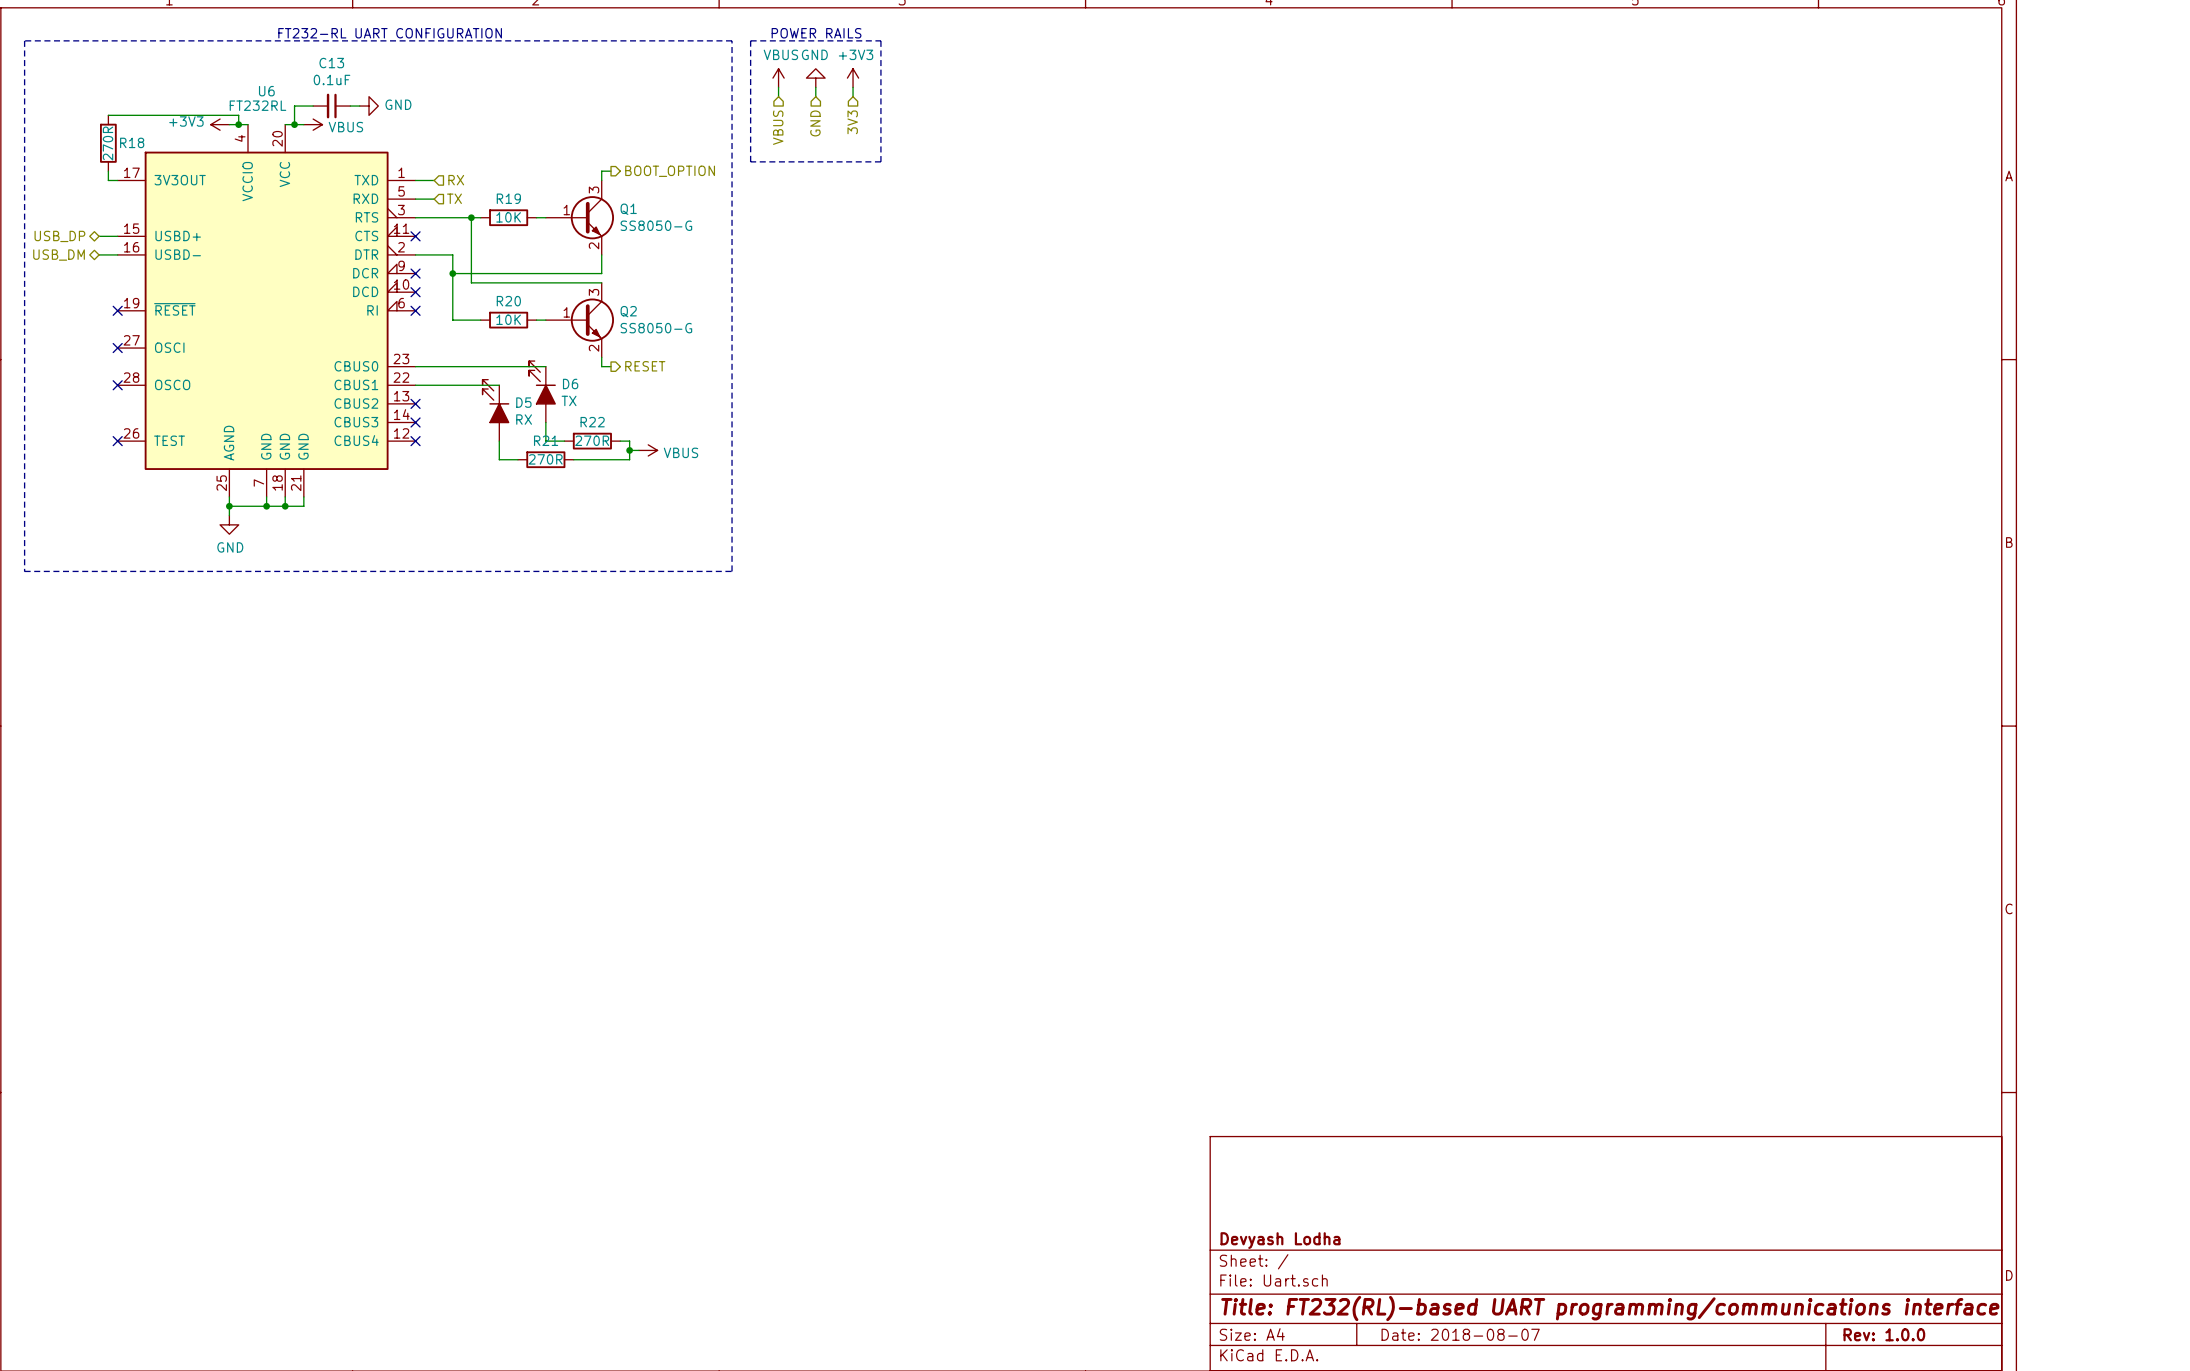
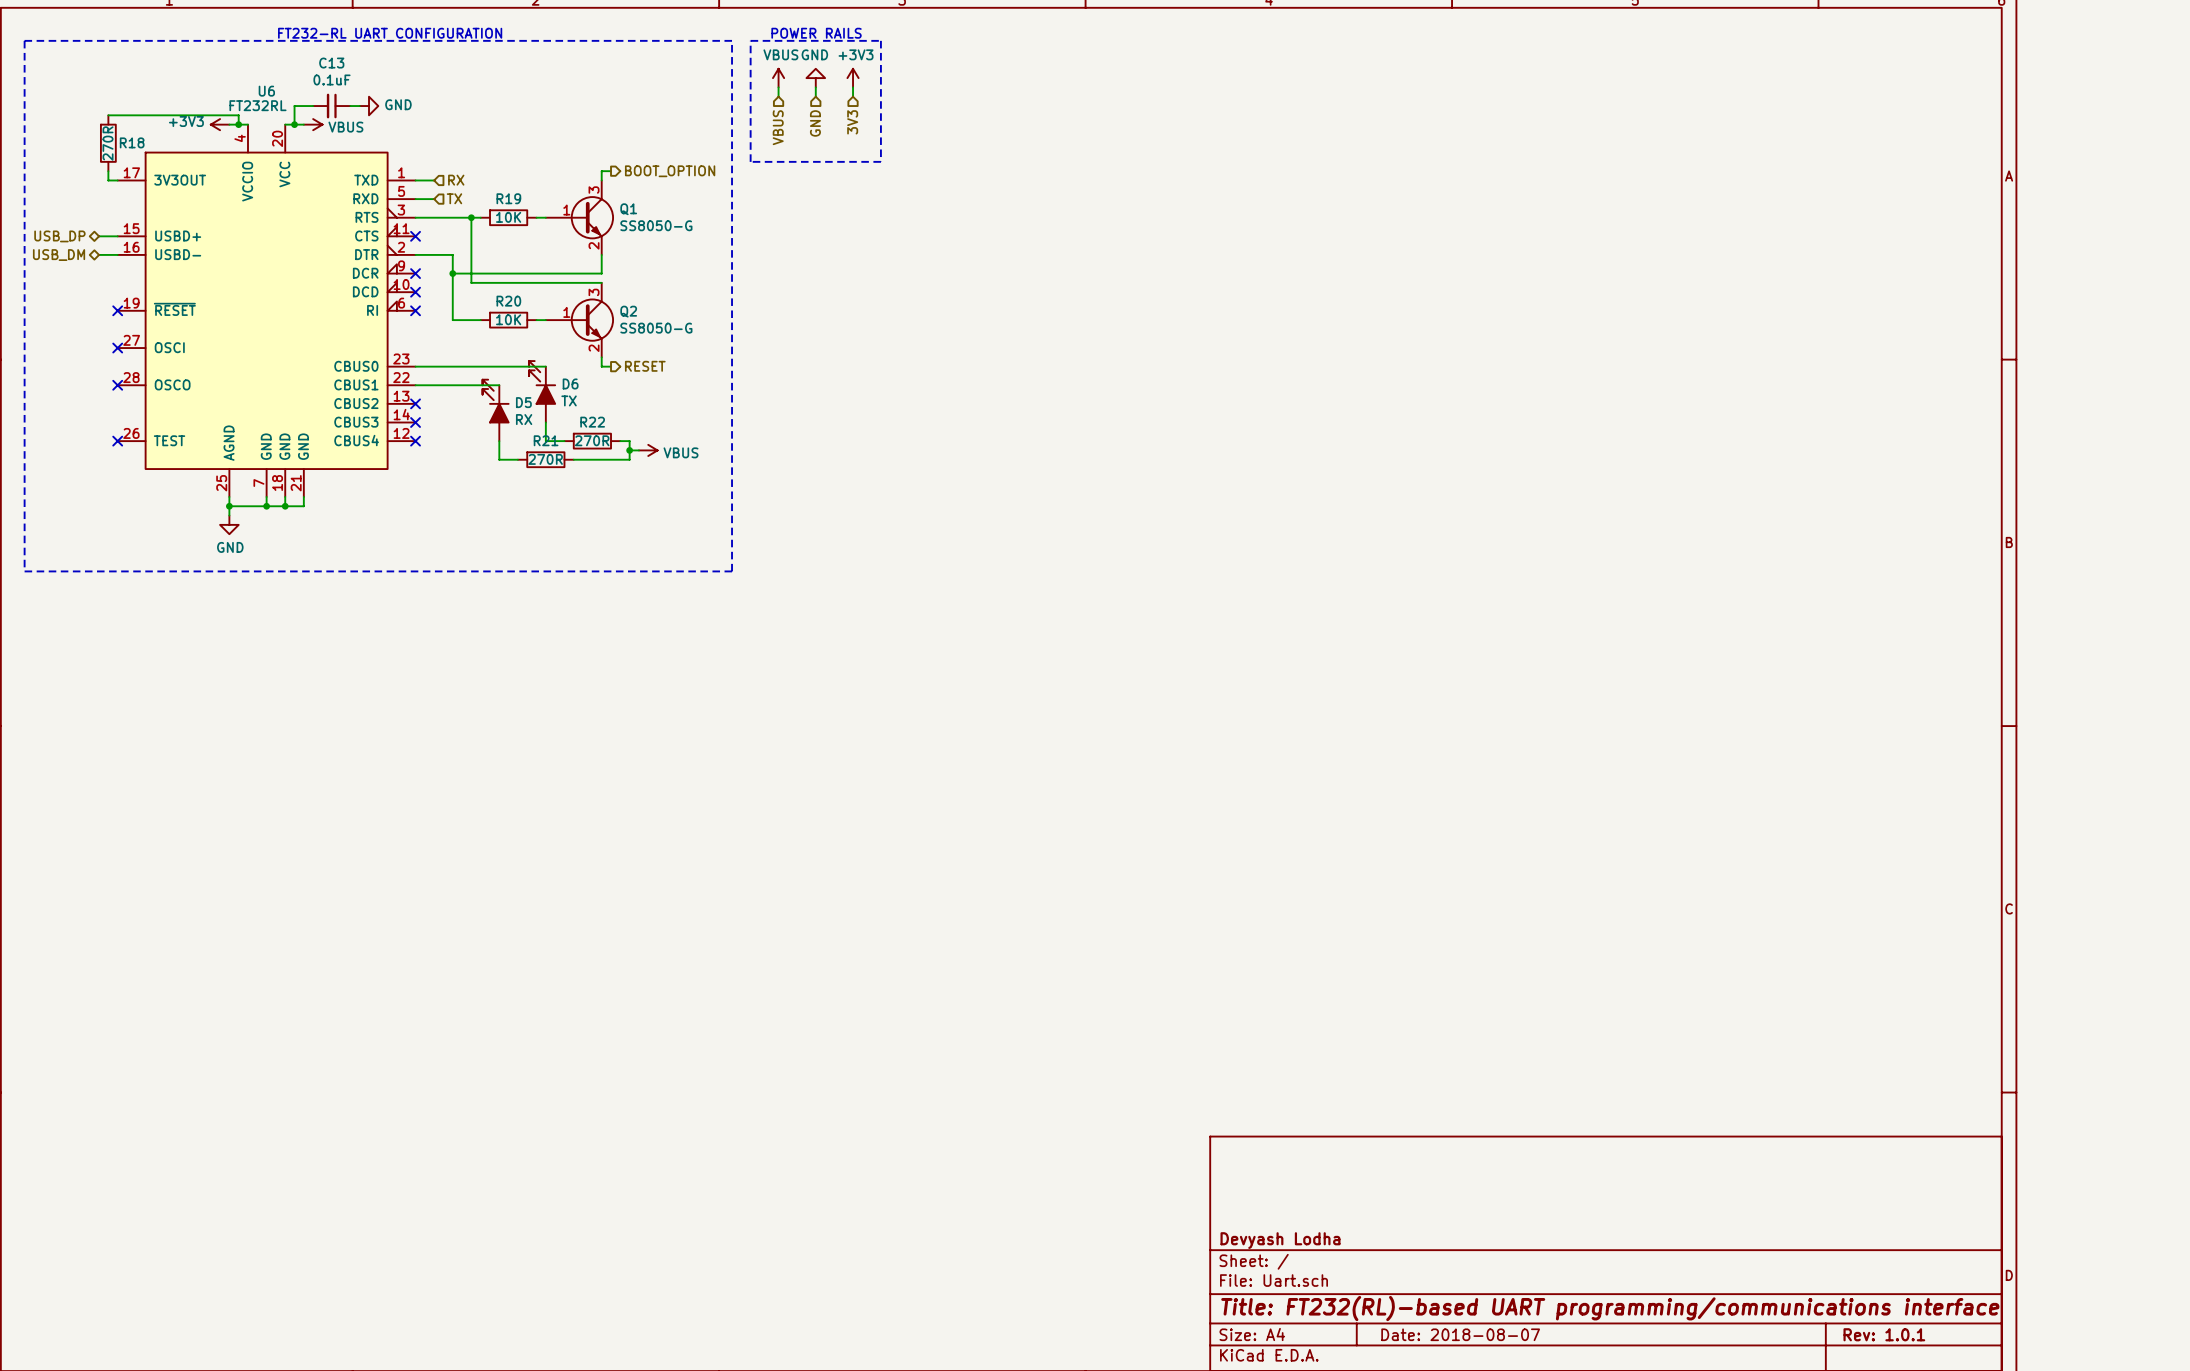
title block: Rev: 1.0.0 (1884, 1334) -> Rev: 1.0.1 (1884, 1334)

